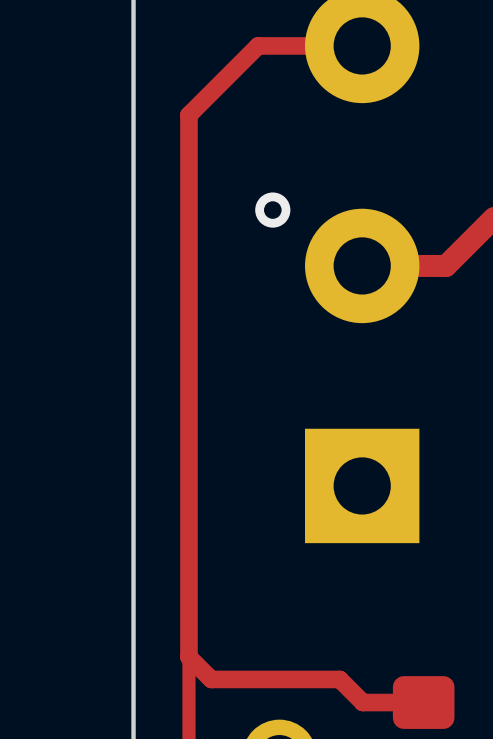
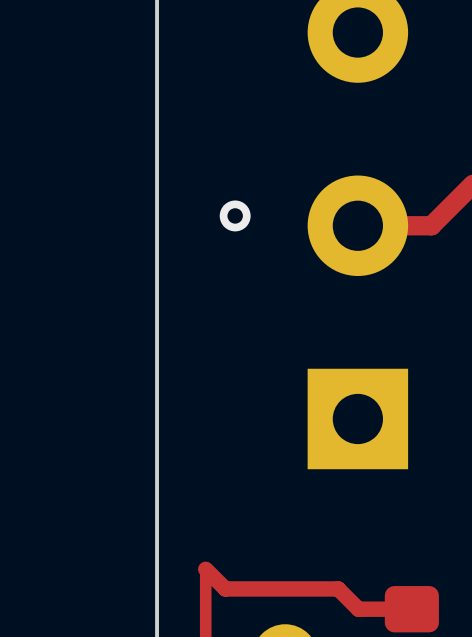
top track: (362, 45) (258, 45) (188, 115) (188, 657) -> none
via position: (272, 210) -> (235, 215)

